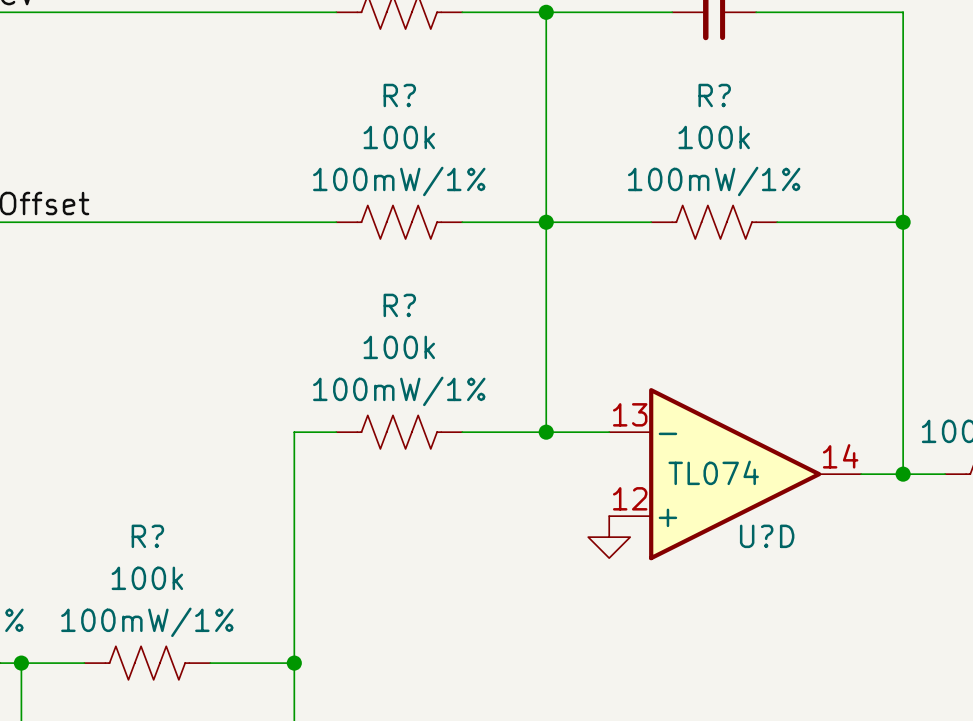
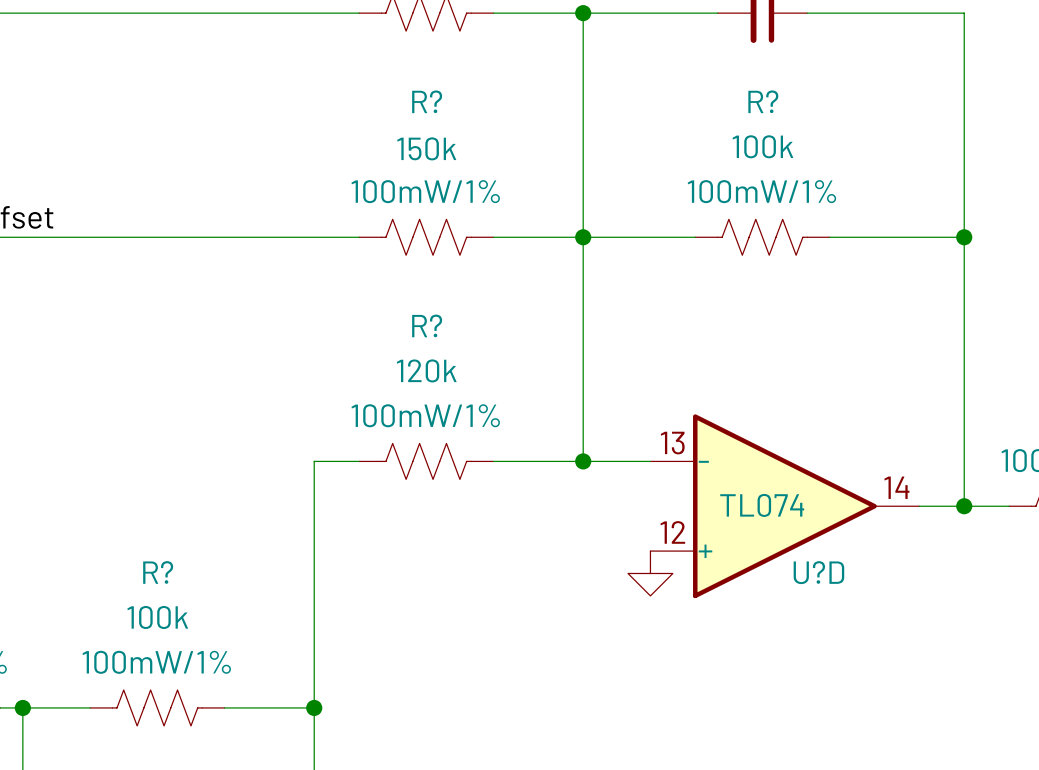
R? value: 100k (399, 137) -> 150k (426, 148)
R? value: 100k (399, 347) -> 120k (426, 370)

